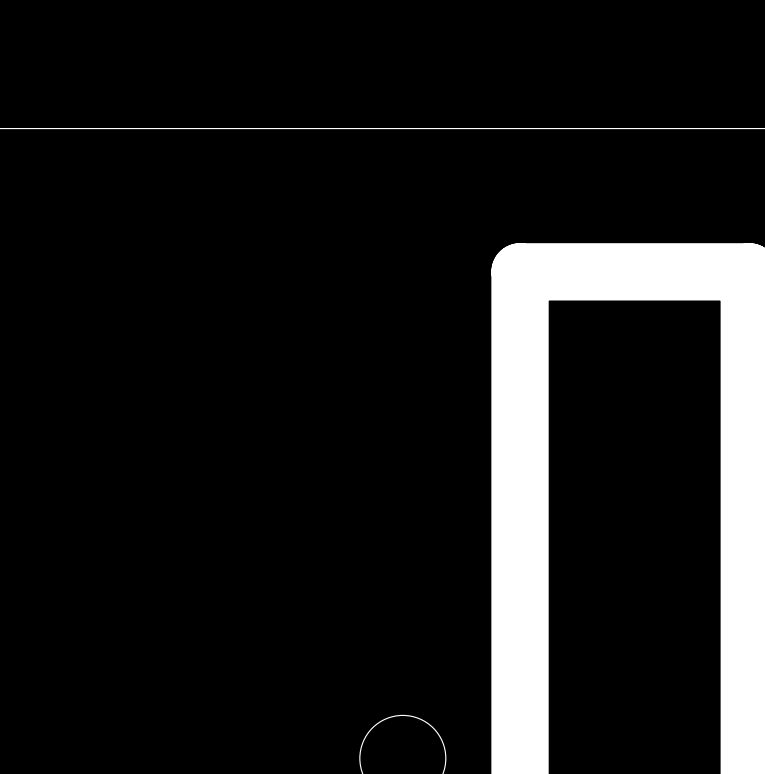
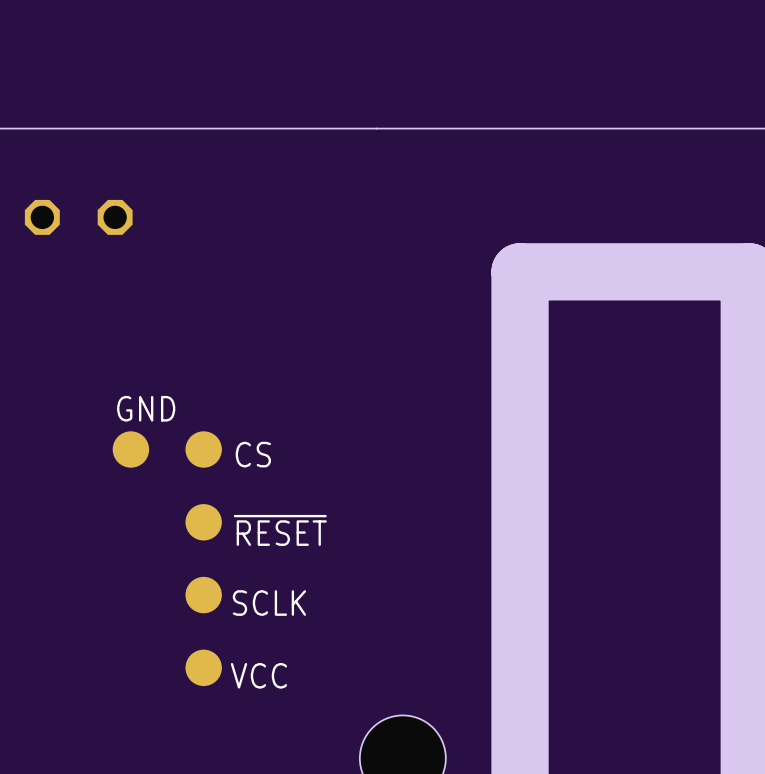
part: none -> (78, 217)
GND: none -> (130, 449)
CS: none -> (203, 449)
~{RESET}: none -> (203, 522)
SCLK: none -> (203, 595)
VCC: none -> (203, 667)

